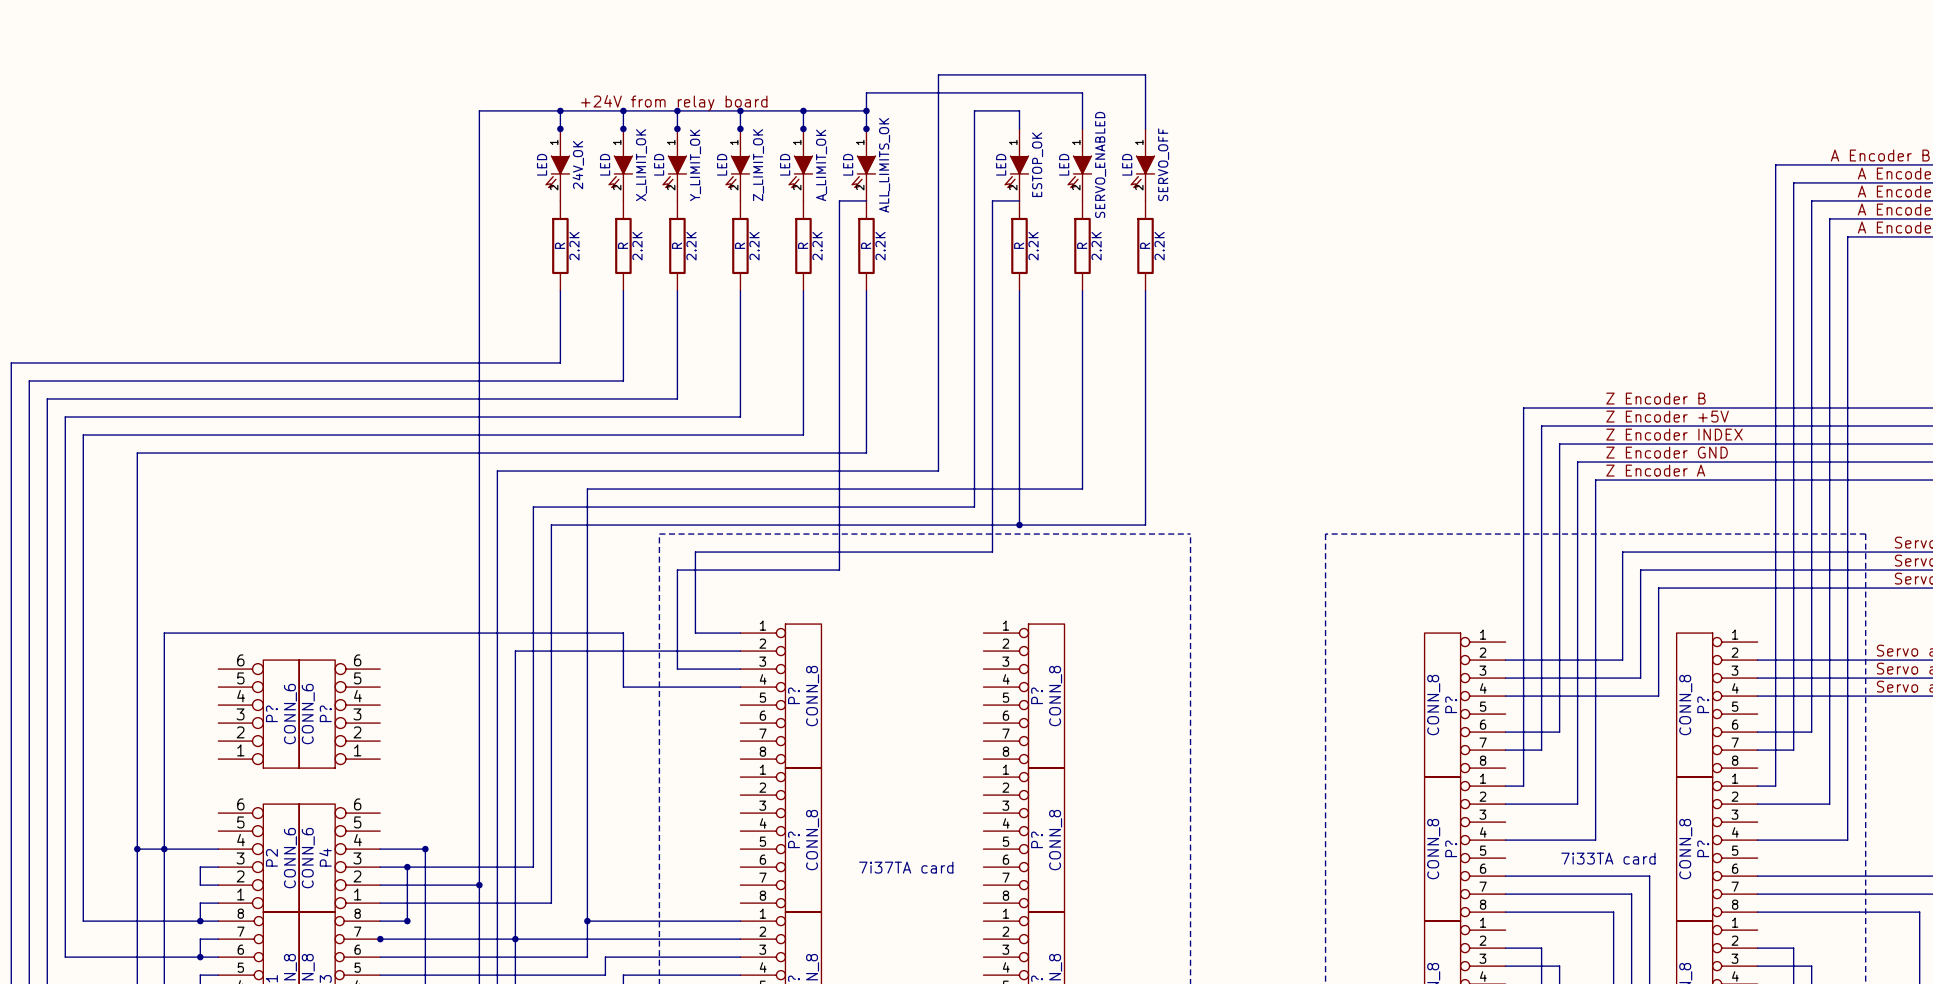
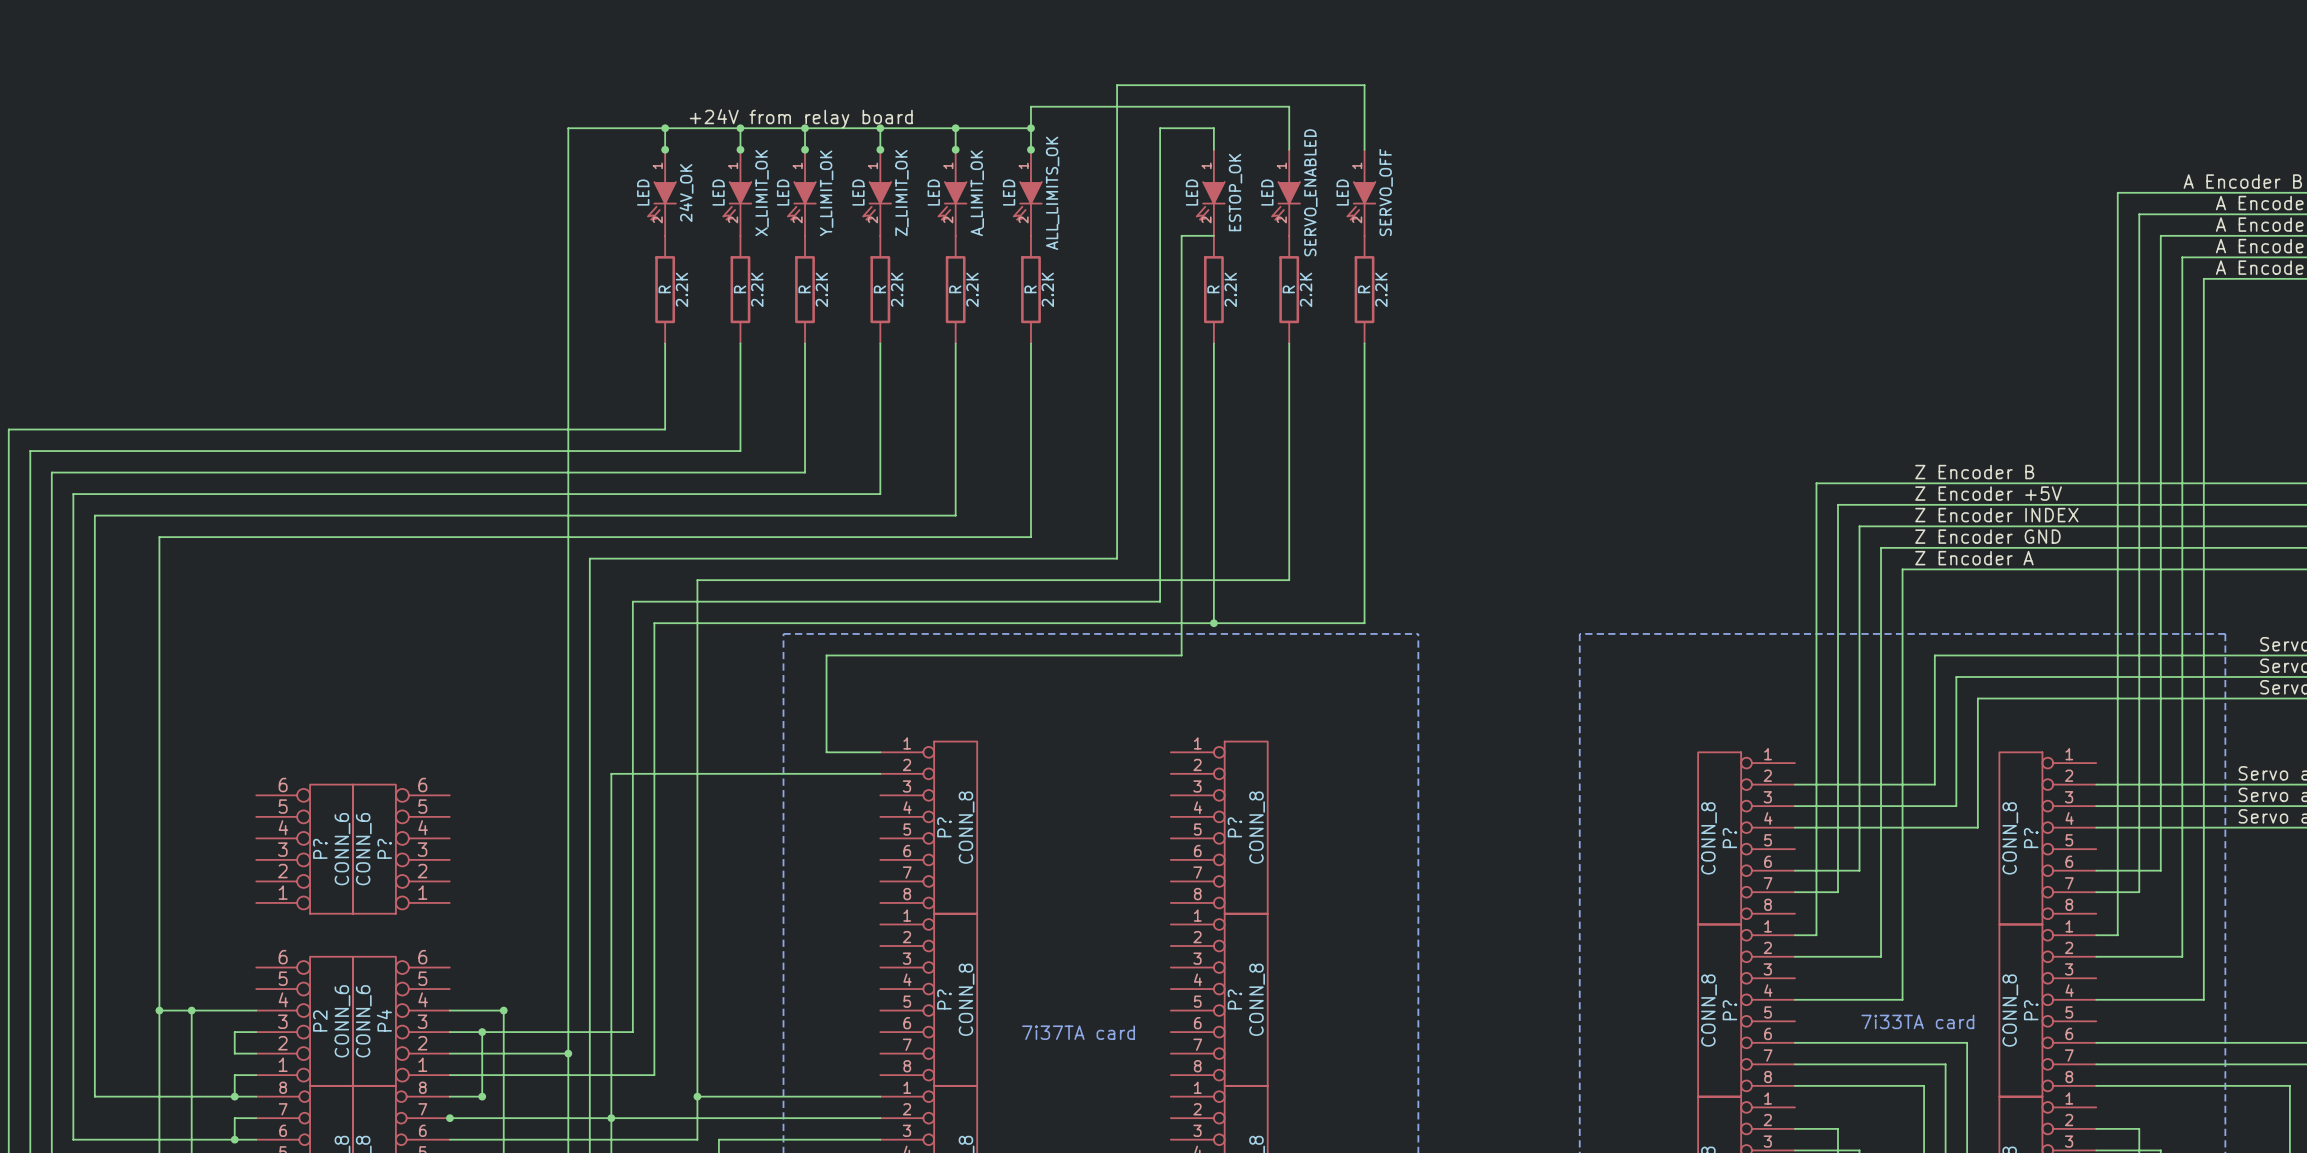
wire: (866, 200) (839, 200) (839, 570) (677, 570) (677, 669) (740, 669) -> none
wire: (740, 687) (623, 687) (623, 633) (164, 633) (164, 849) -> none

